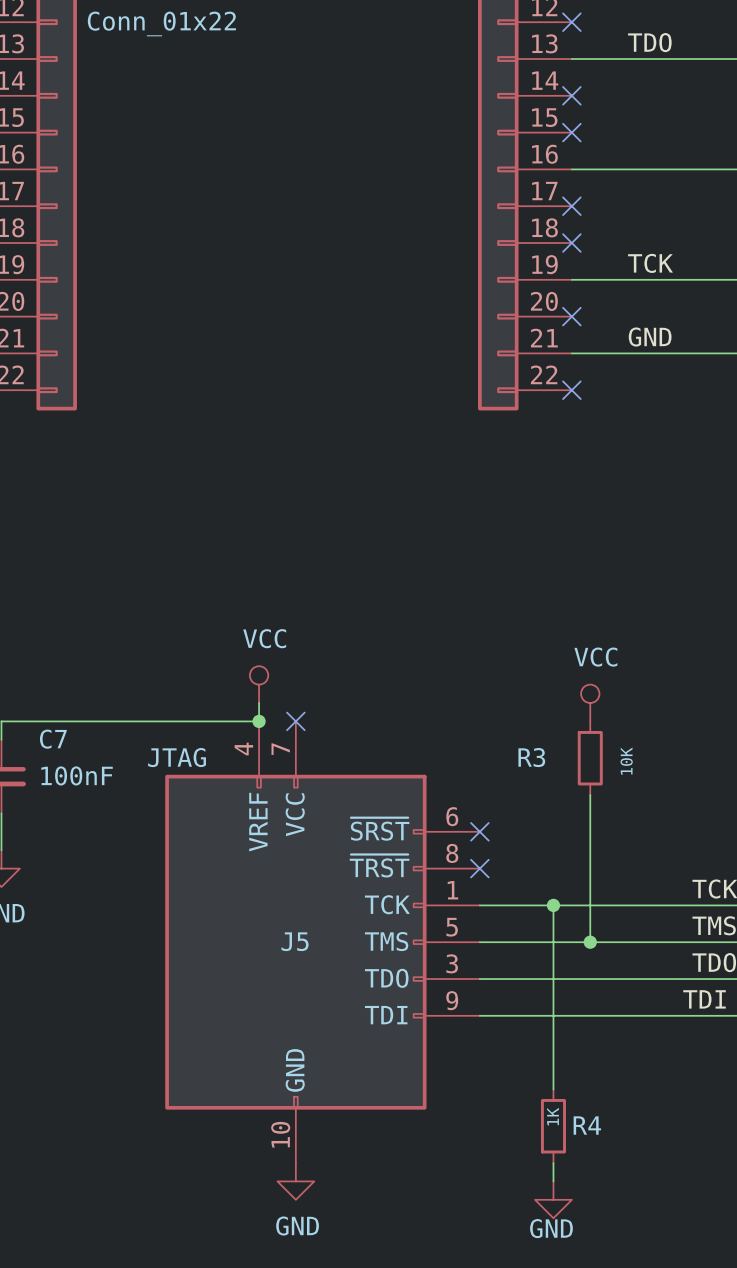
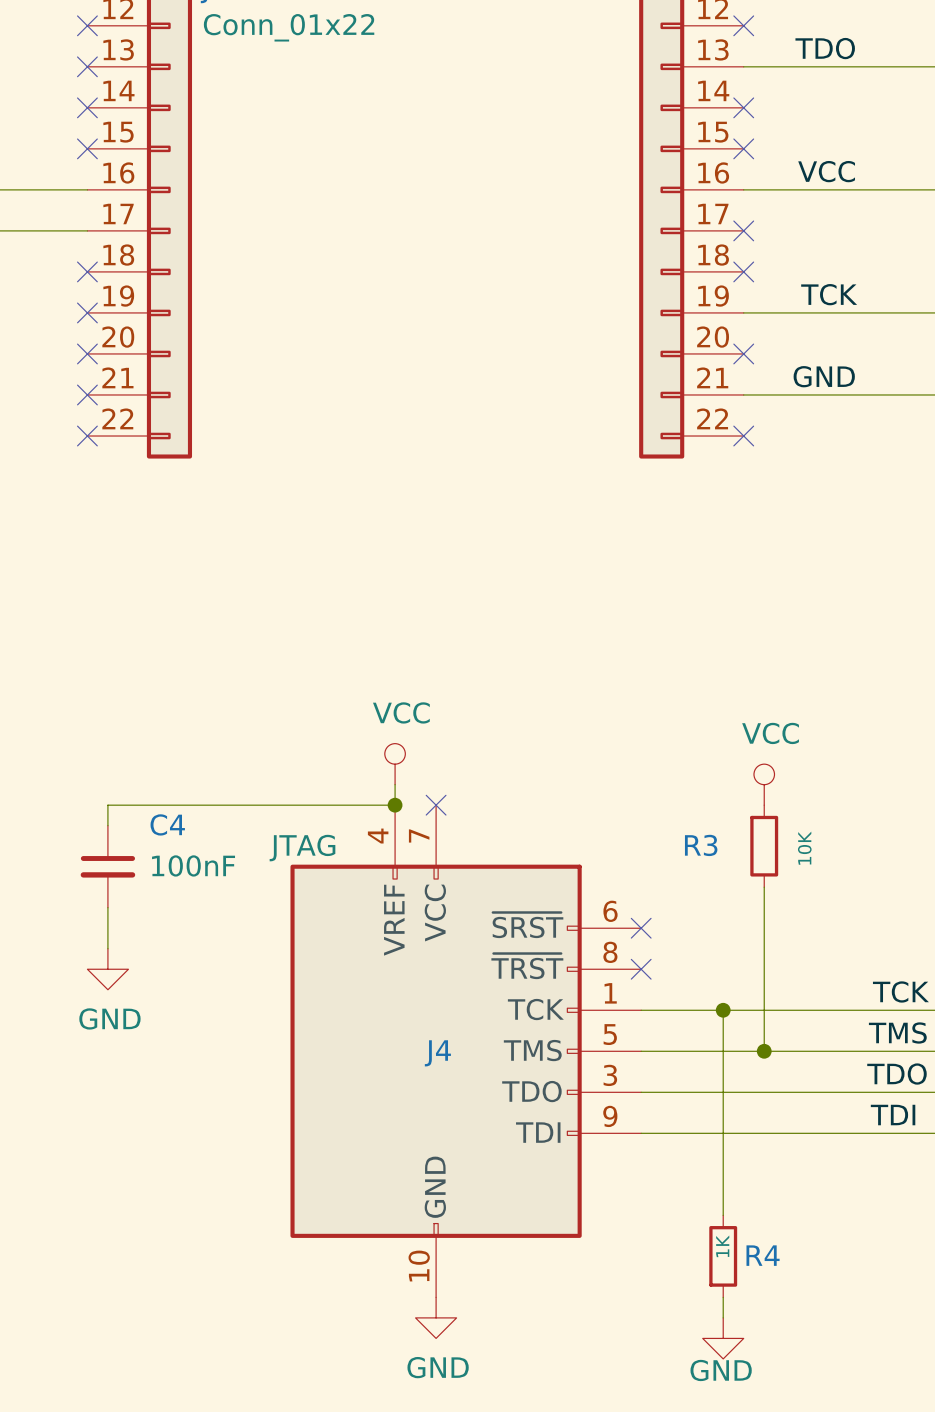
label: none -> VCC (826, 171)
C7 name: C7 (53, 739) -> C4 (167, 824)
J5 name: J5 (295, 941) -> J4 (437, 1053)

